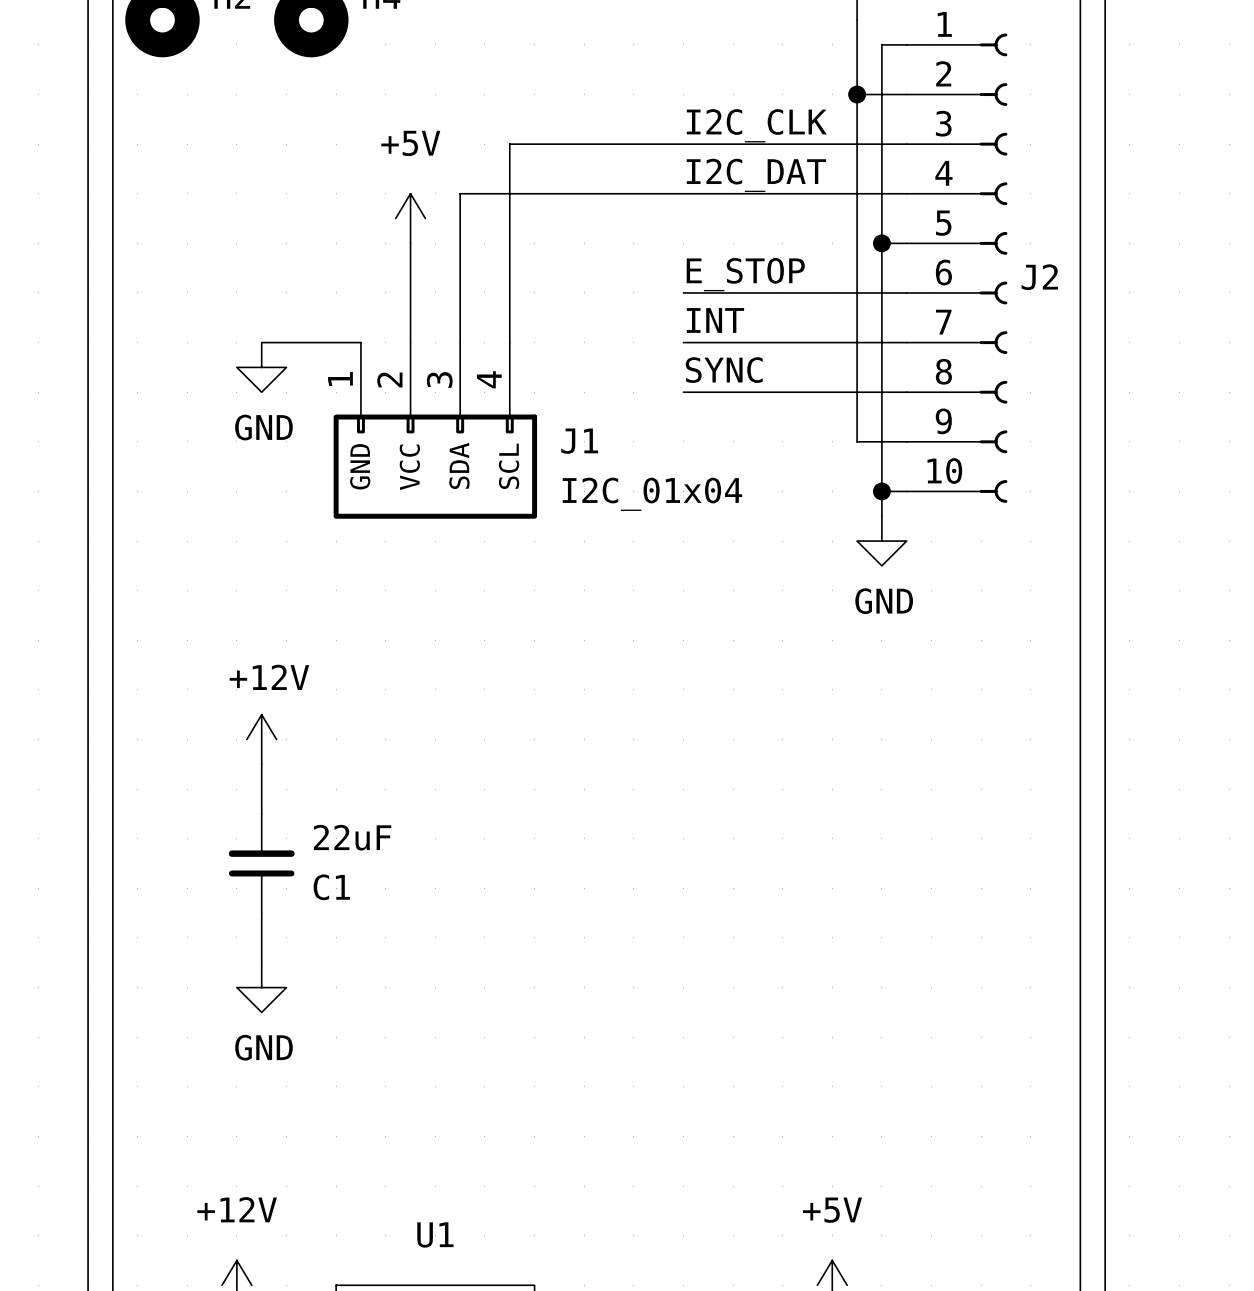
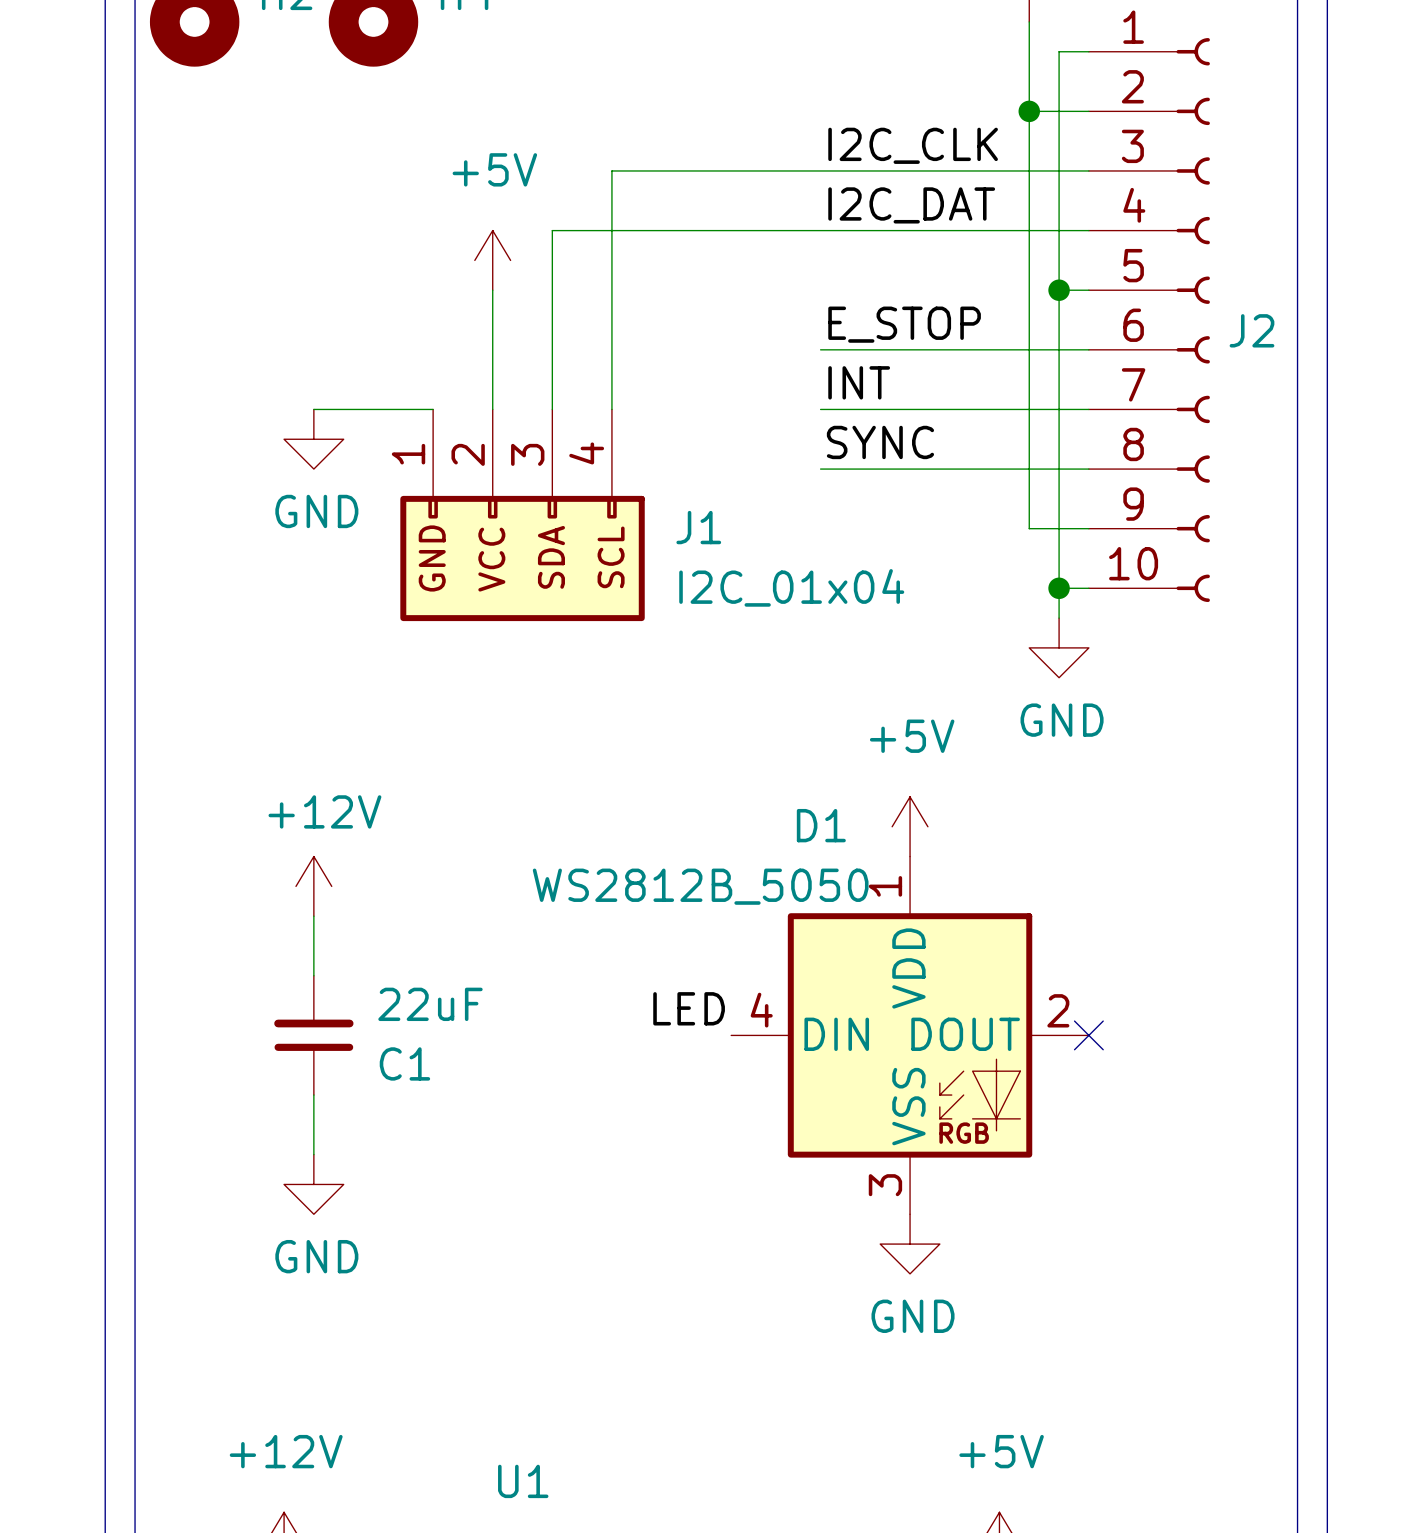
power symbol: none -> +5V (910, 826)
label: none -> LED (689, 1008)
D1: none -> WS2812B_5050 (910, 1035)
no-connect mark: none -> (1088, 1035)
power symbol: none -> GND (910, 1244)

